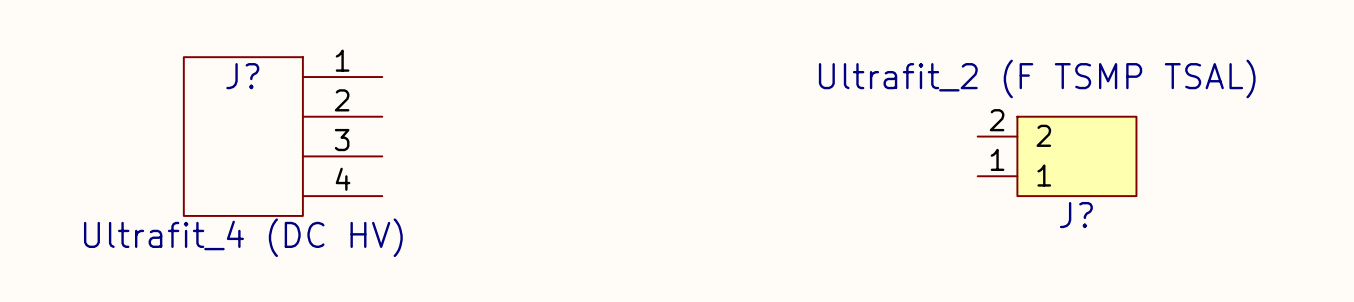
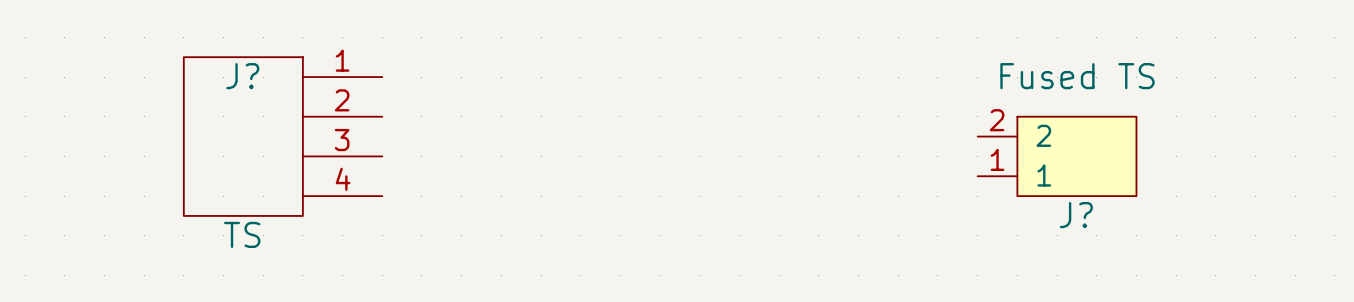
J? value: Ultrafit_2 (F TSMP TSAL) (1037, 78) -> Fused TS (1077, 76)
J? value: Ultrafit_4 (DC HV) (243, 237) -> TS (242, 234)

